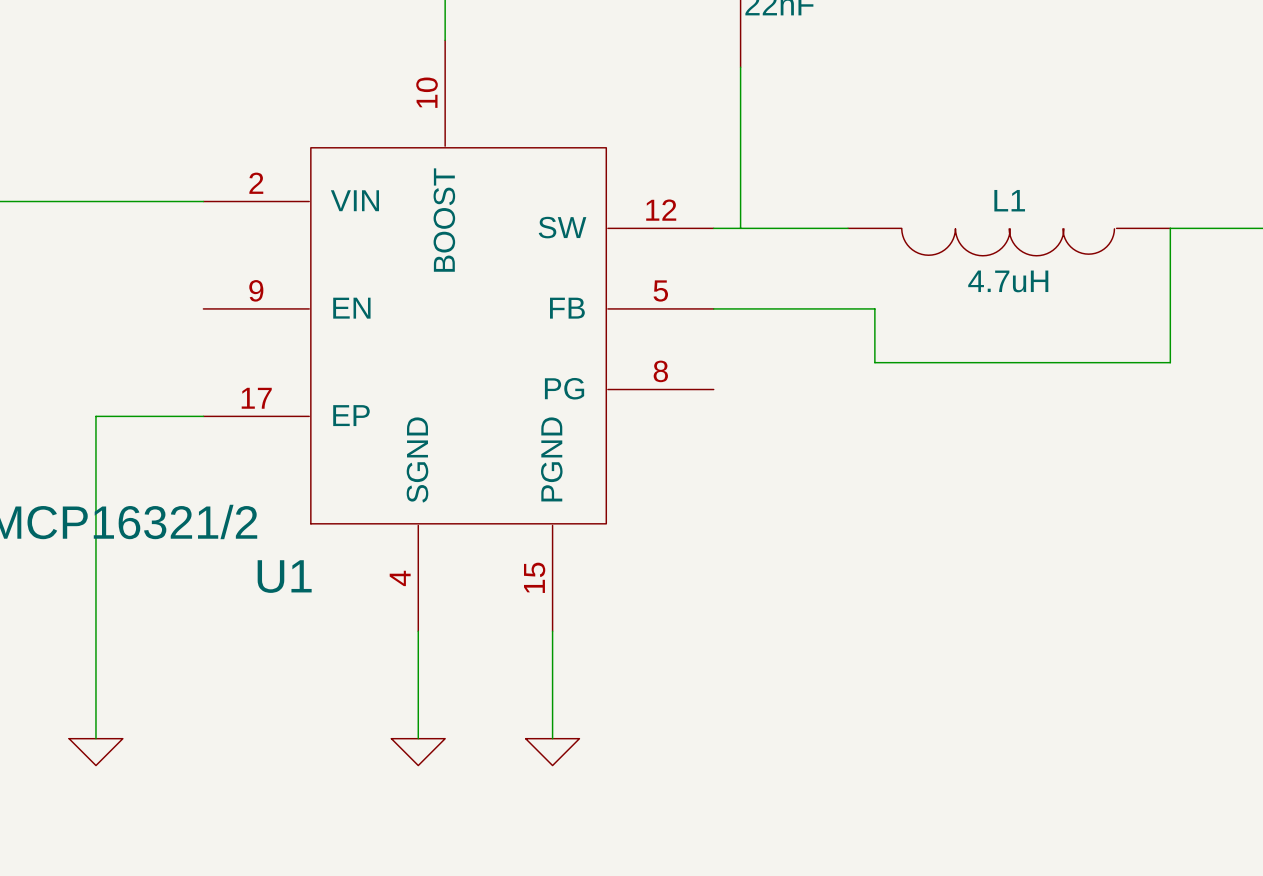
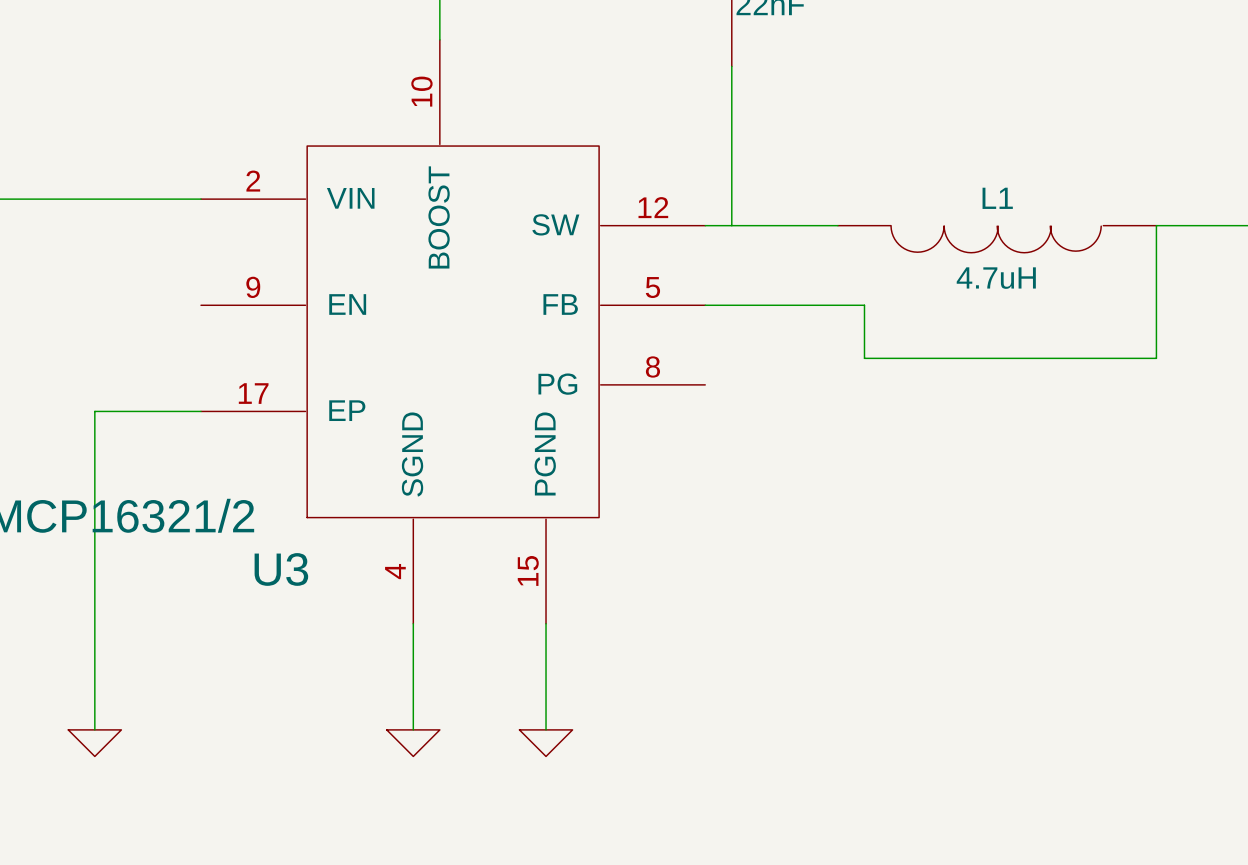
U1 name: U1 (284, 576) -> U3 (281, 569)

